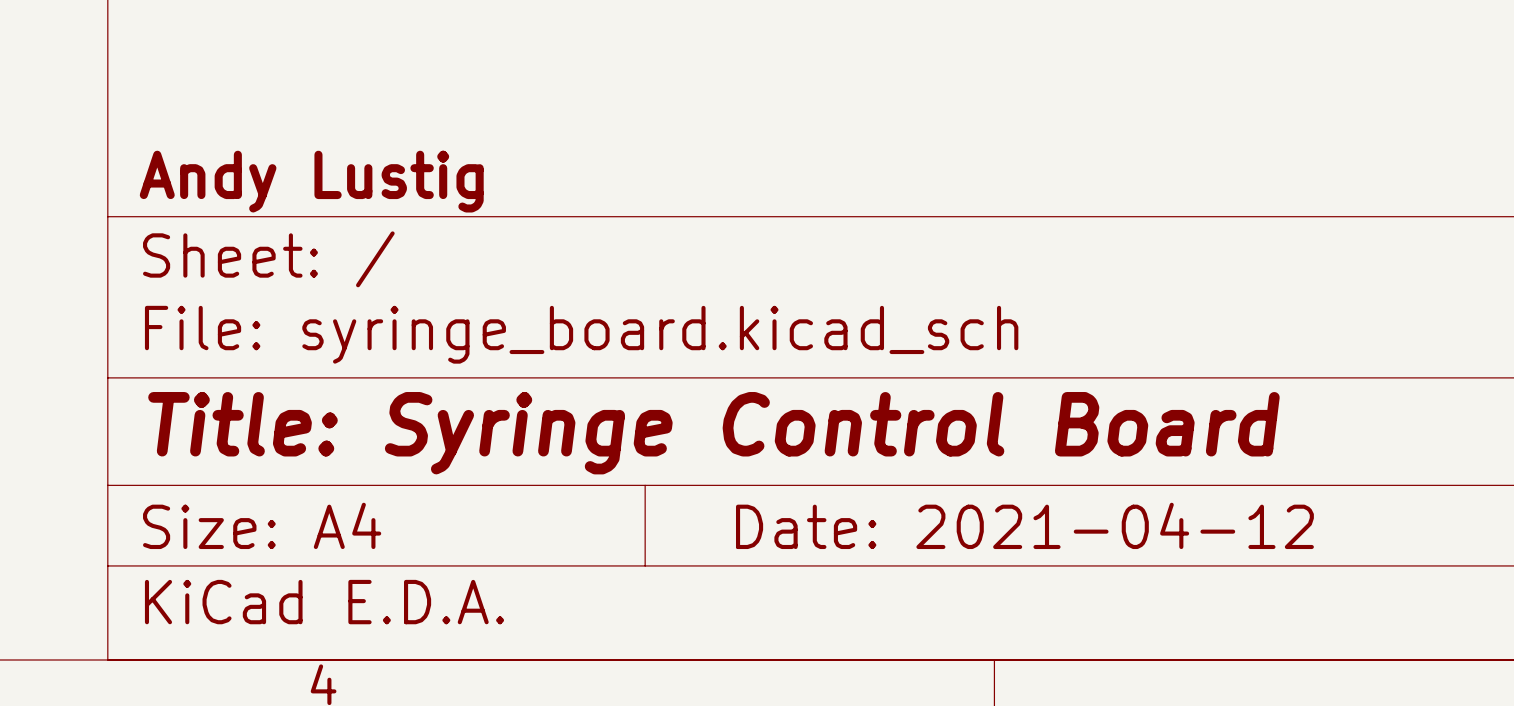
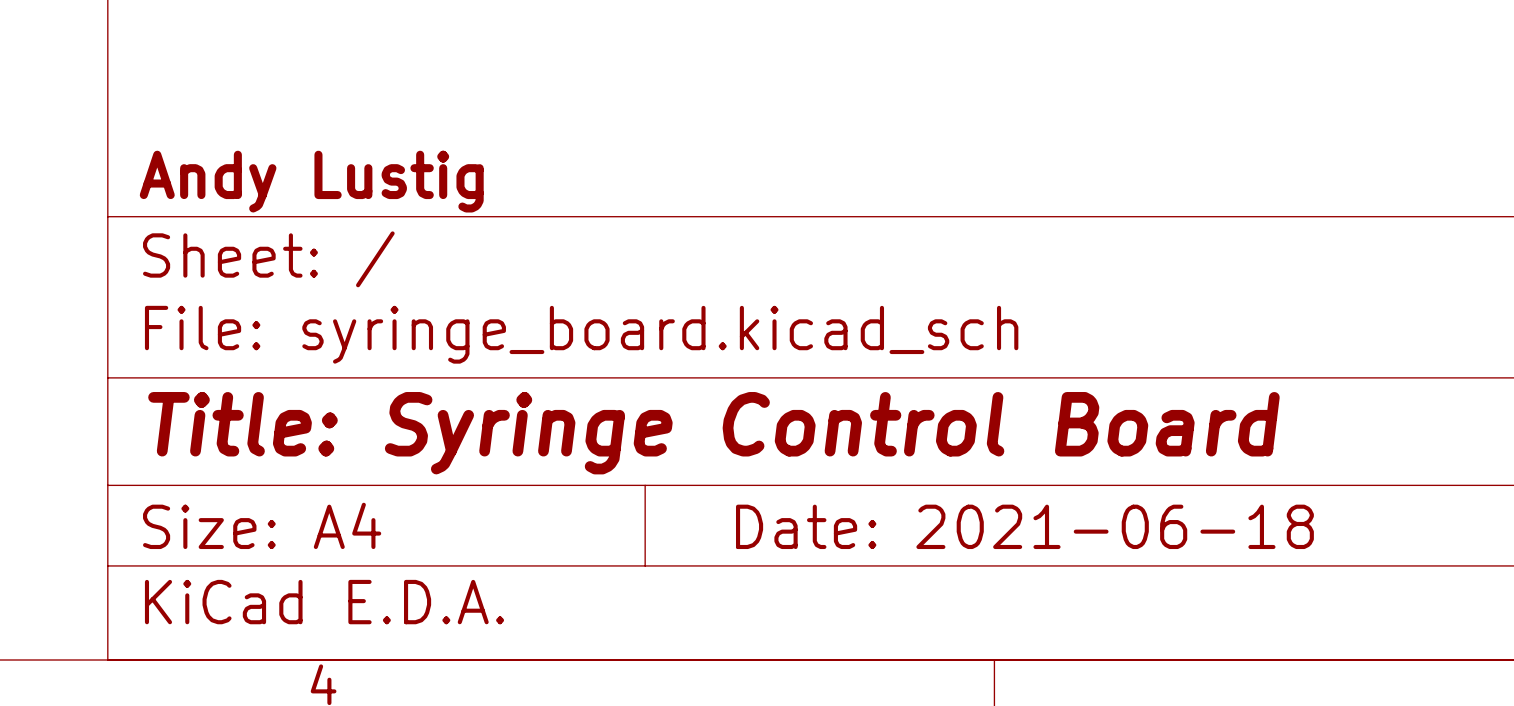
title block: Date: 2021-04-12 (1024, 525) -> Date: 2021-06-18 (1024, 526)

